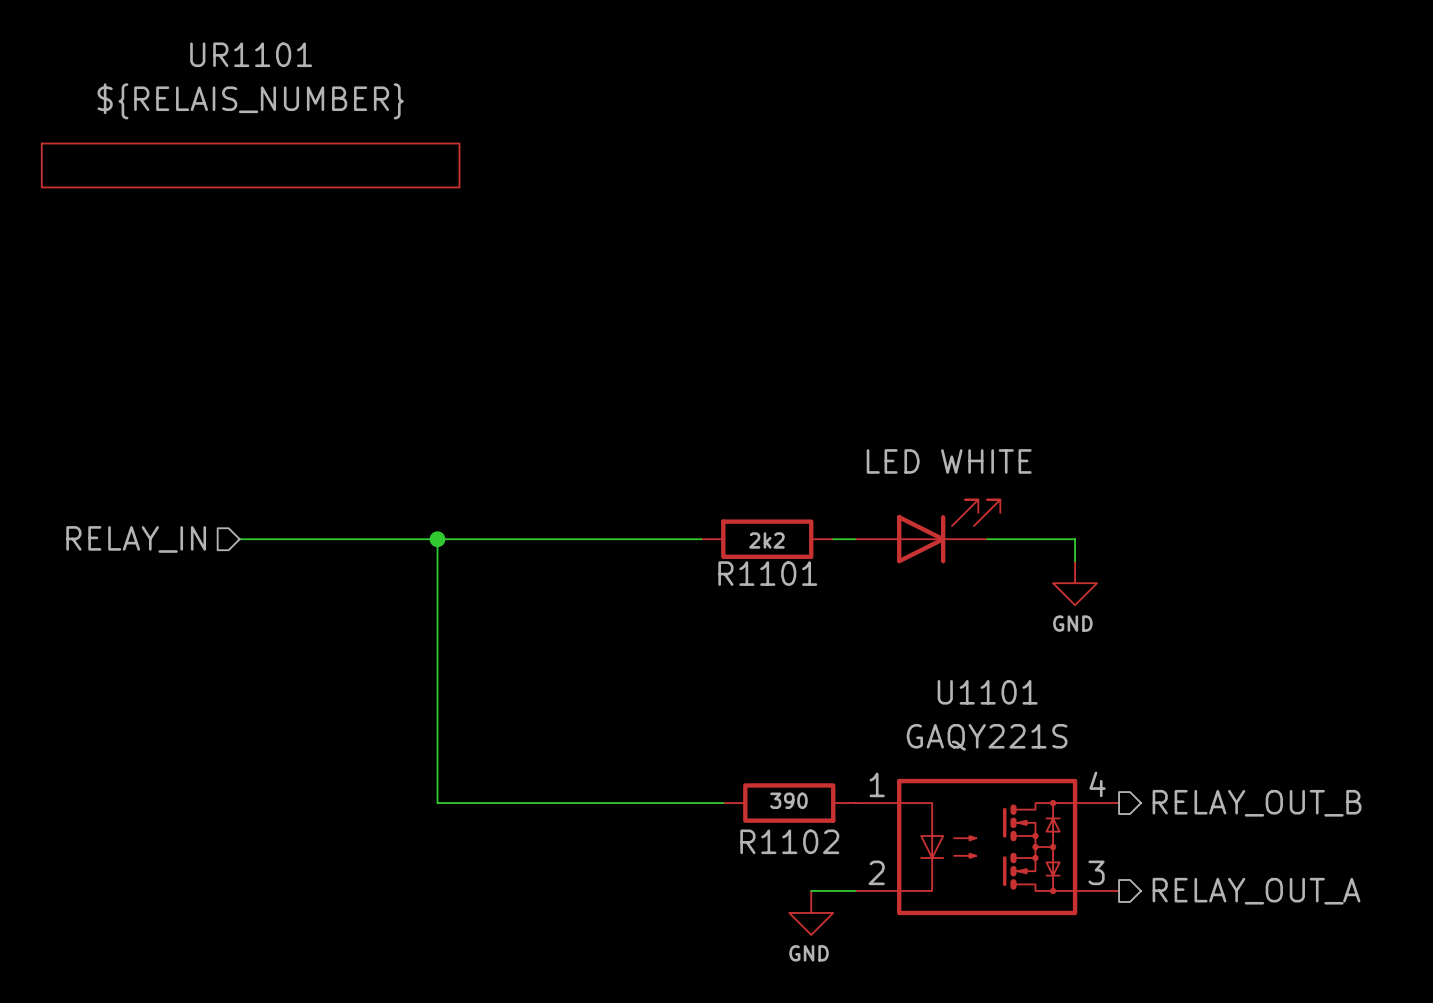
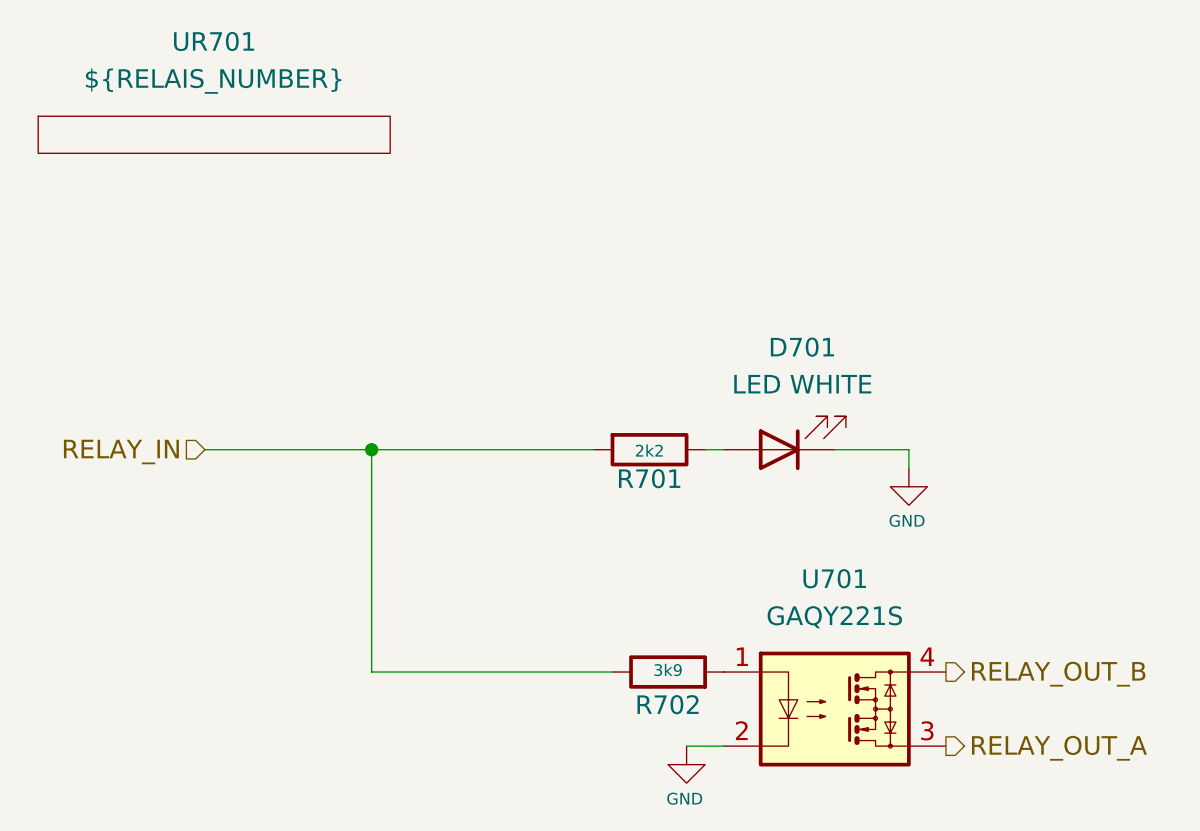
UR1101 name: UR1101 (251, 54) -> UR701 (214, 41)
D701 name: none -> D701 (802, 347)
R1101 name: R1101 (767, 573) -> R701 (649, 478)
U1101 name: U1101 (987, 692) -> U701 (834, 578)
R1102 value: 390 (788, 800) -> 3k9 (668, 669)
R1102 name: R1102 (789, 841) -> R702 (668, 704)

